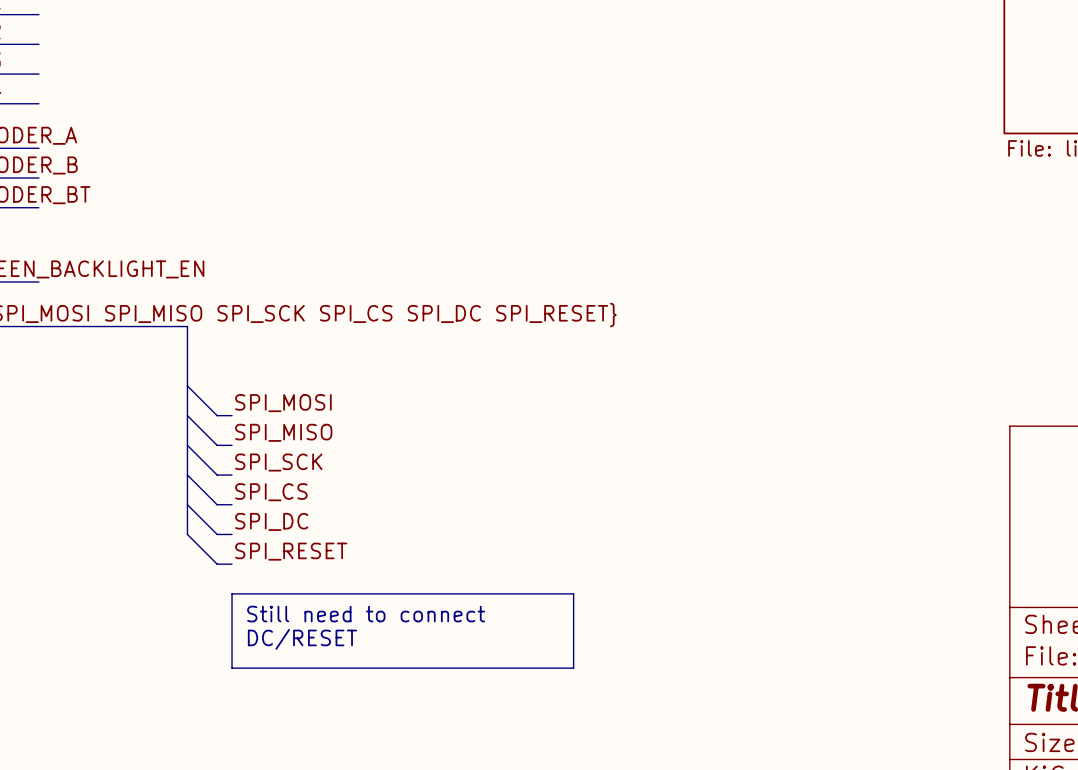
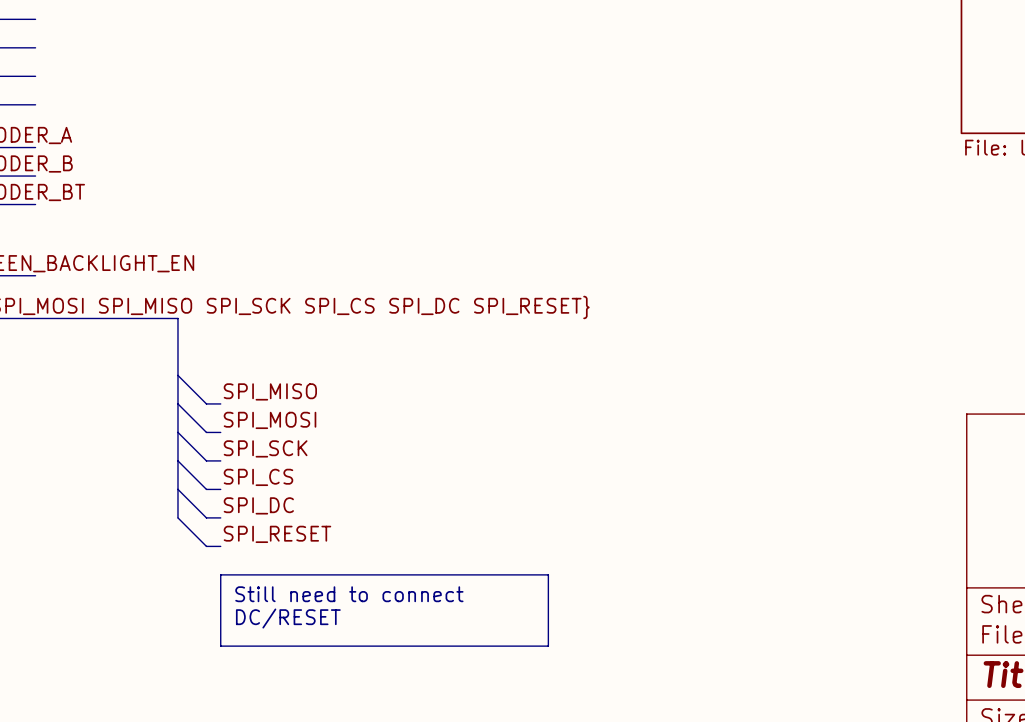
label: SPI_MOSI (283, 403) -> SPI_MISO (270, 391)
label: SPI_MISO (283, 432) -> SPI_MOSI (270, 420)

